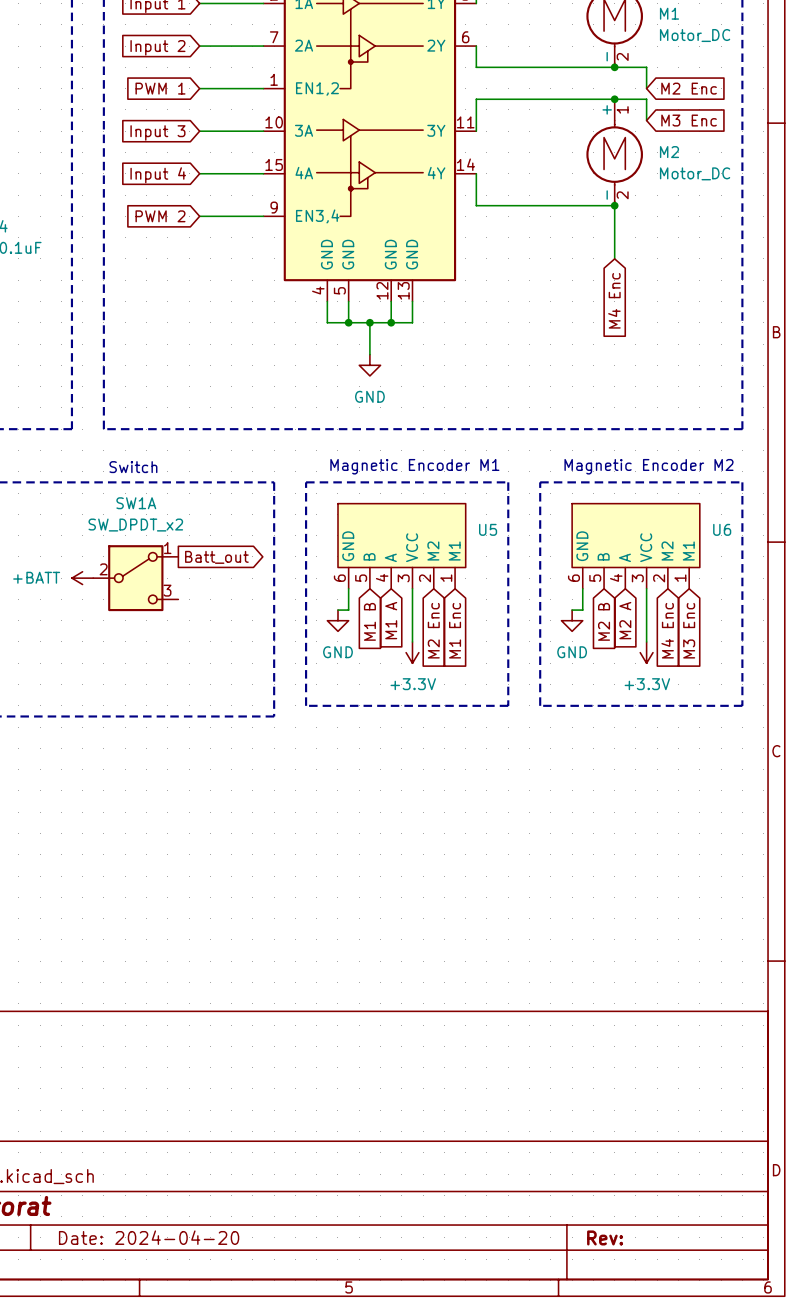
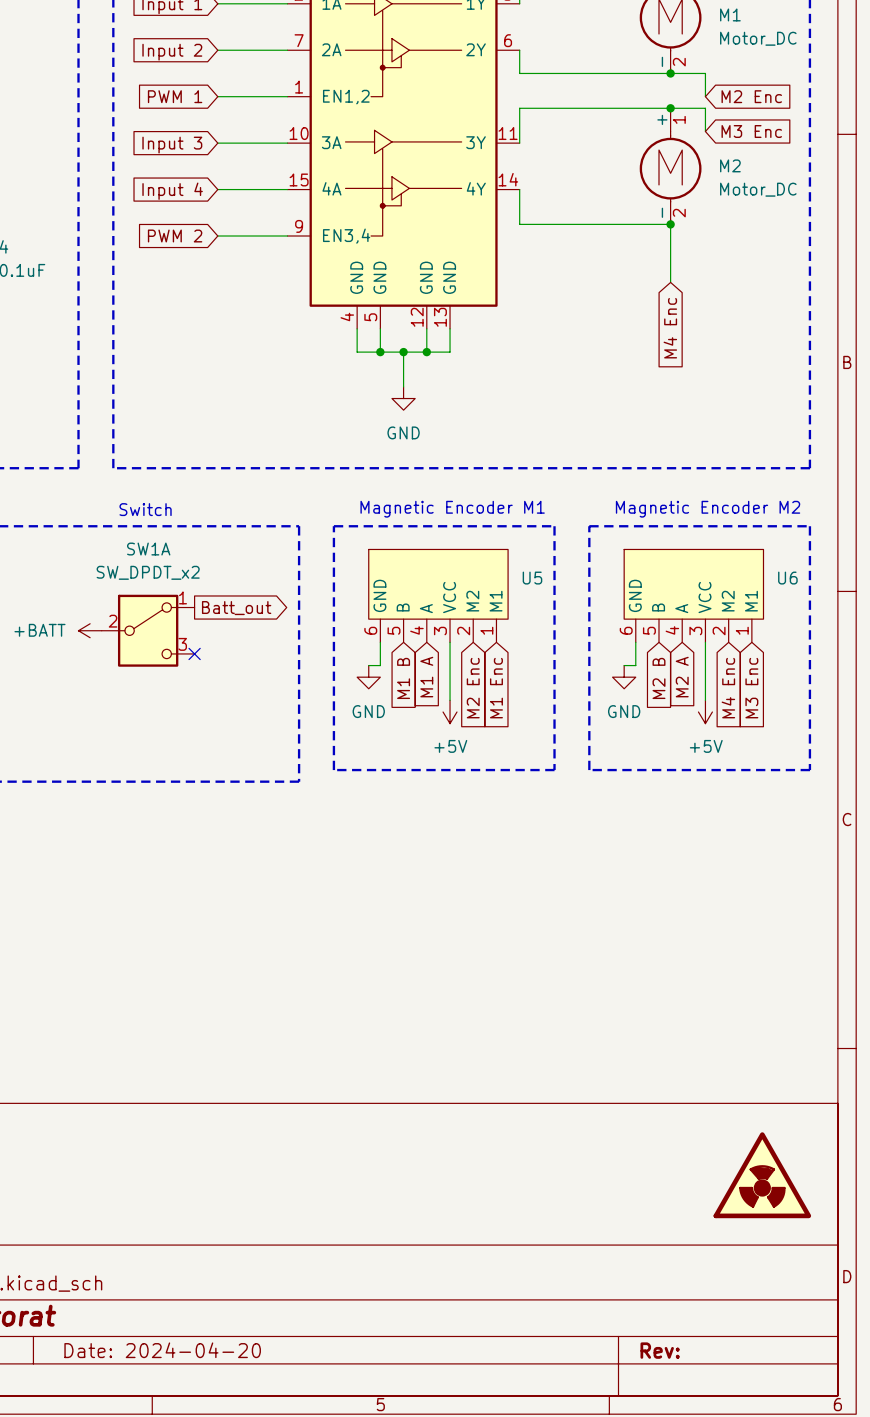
no-connect mark: none -> (194, 653)
power symbol: +3.3V (412, 652) -> +5V (450, 712)
power symbol: +3.3V (646, 652) -> +5V (705, 712)
power symbol: none -> (762, 1175)

